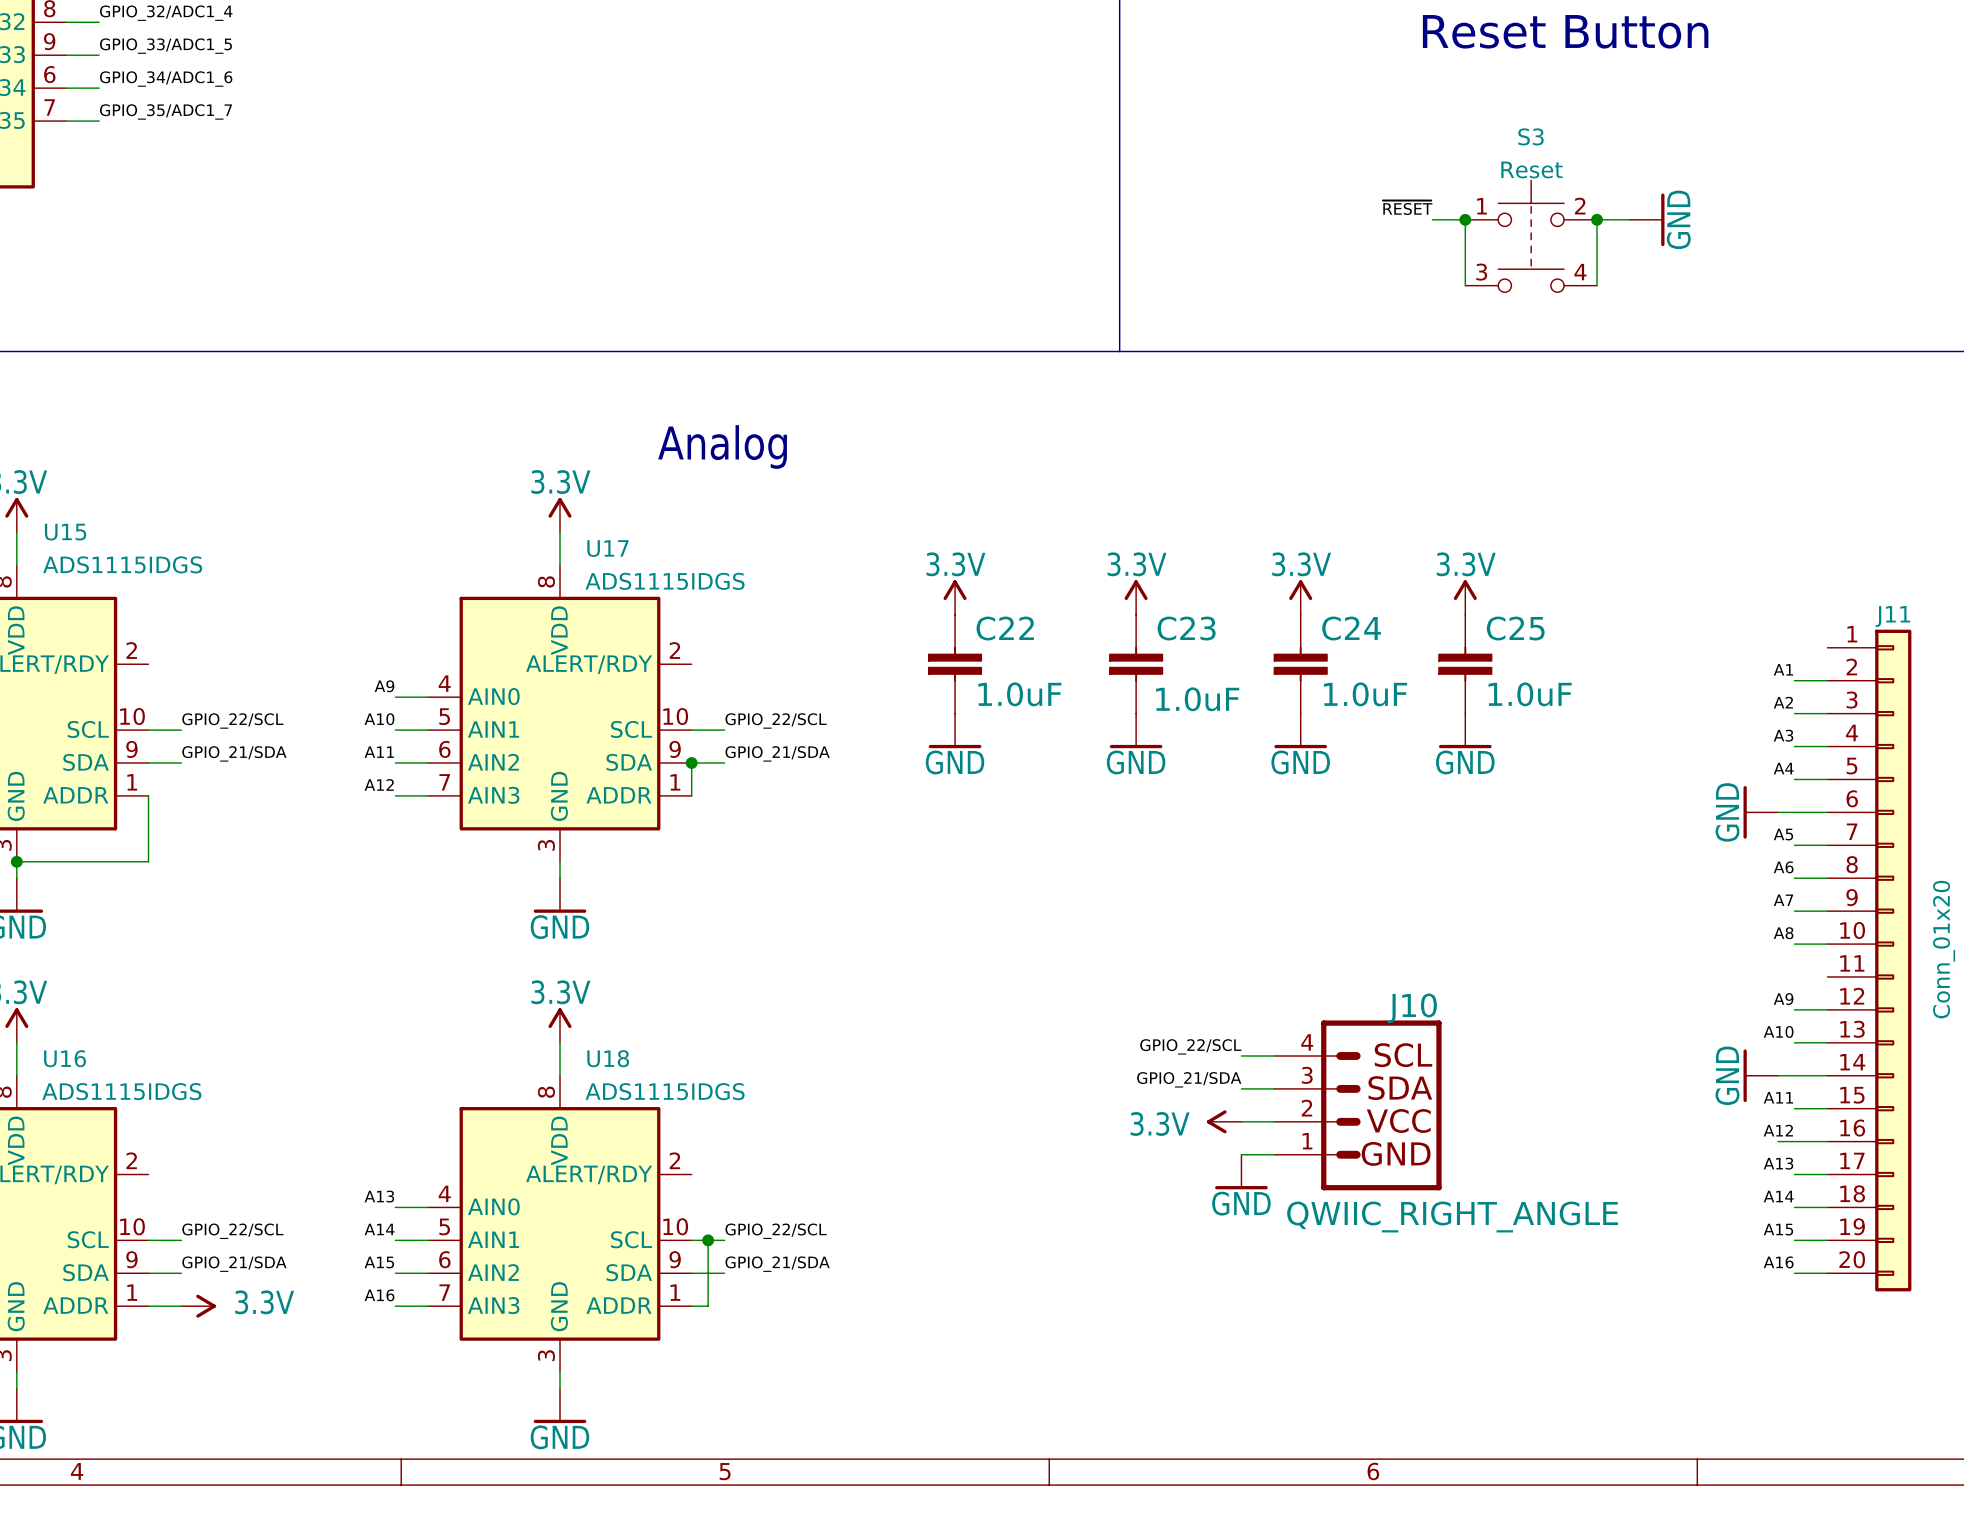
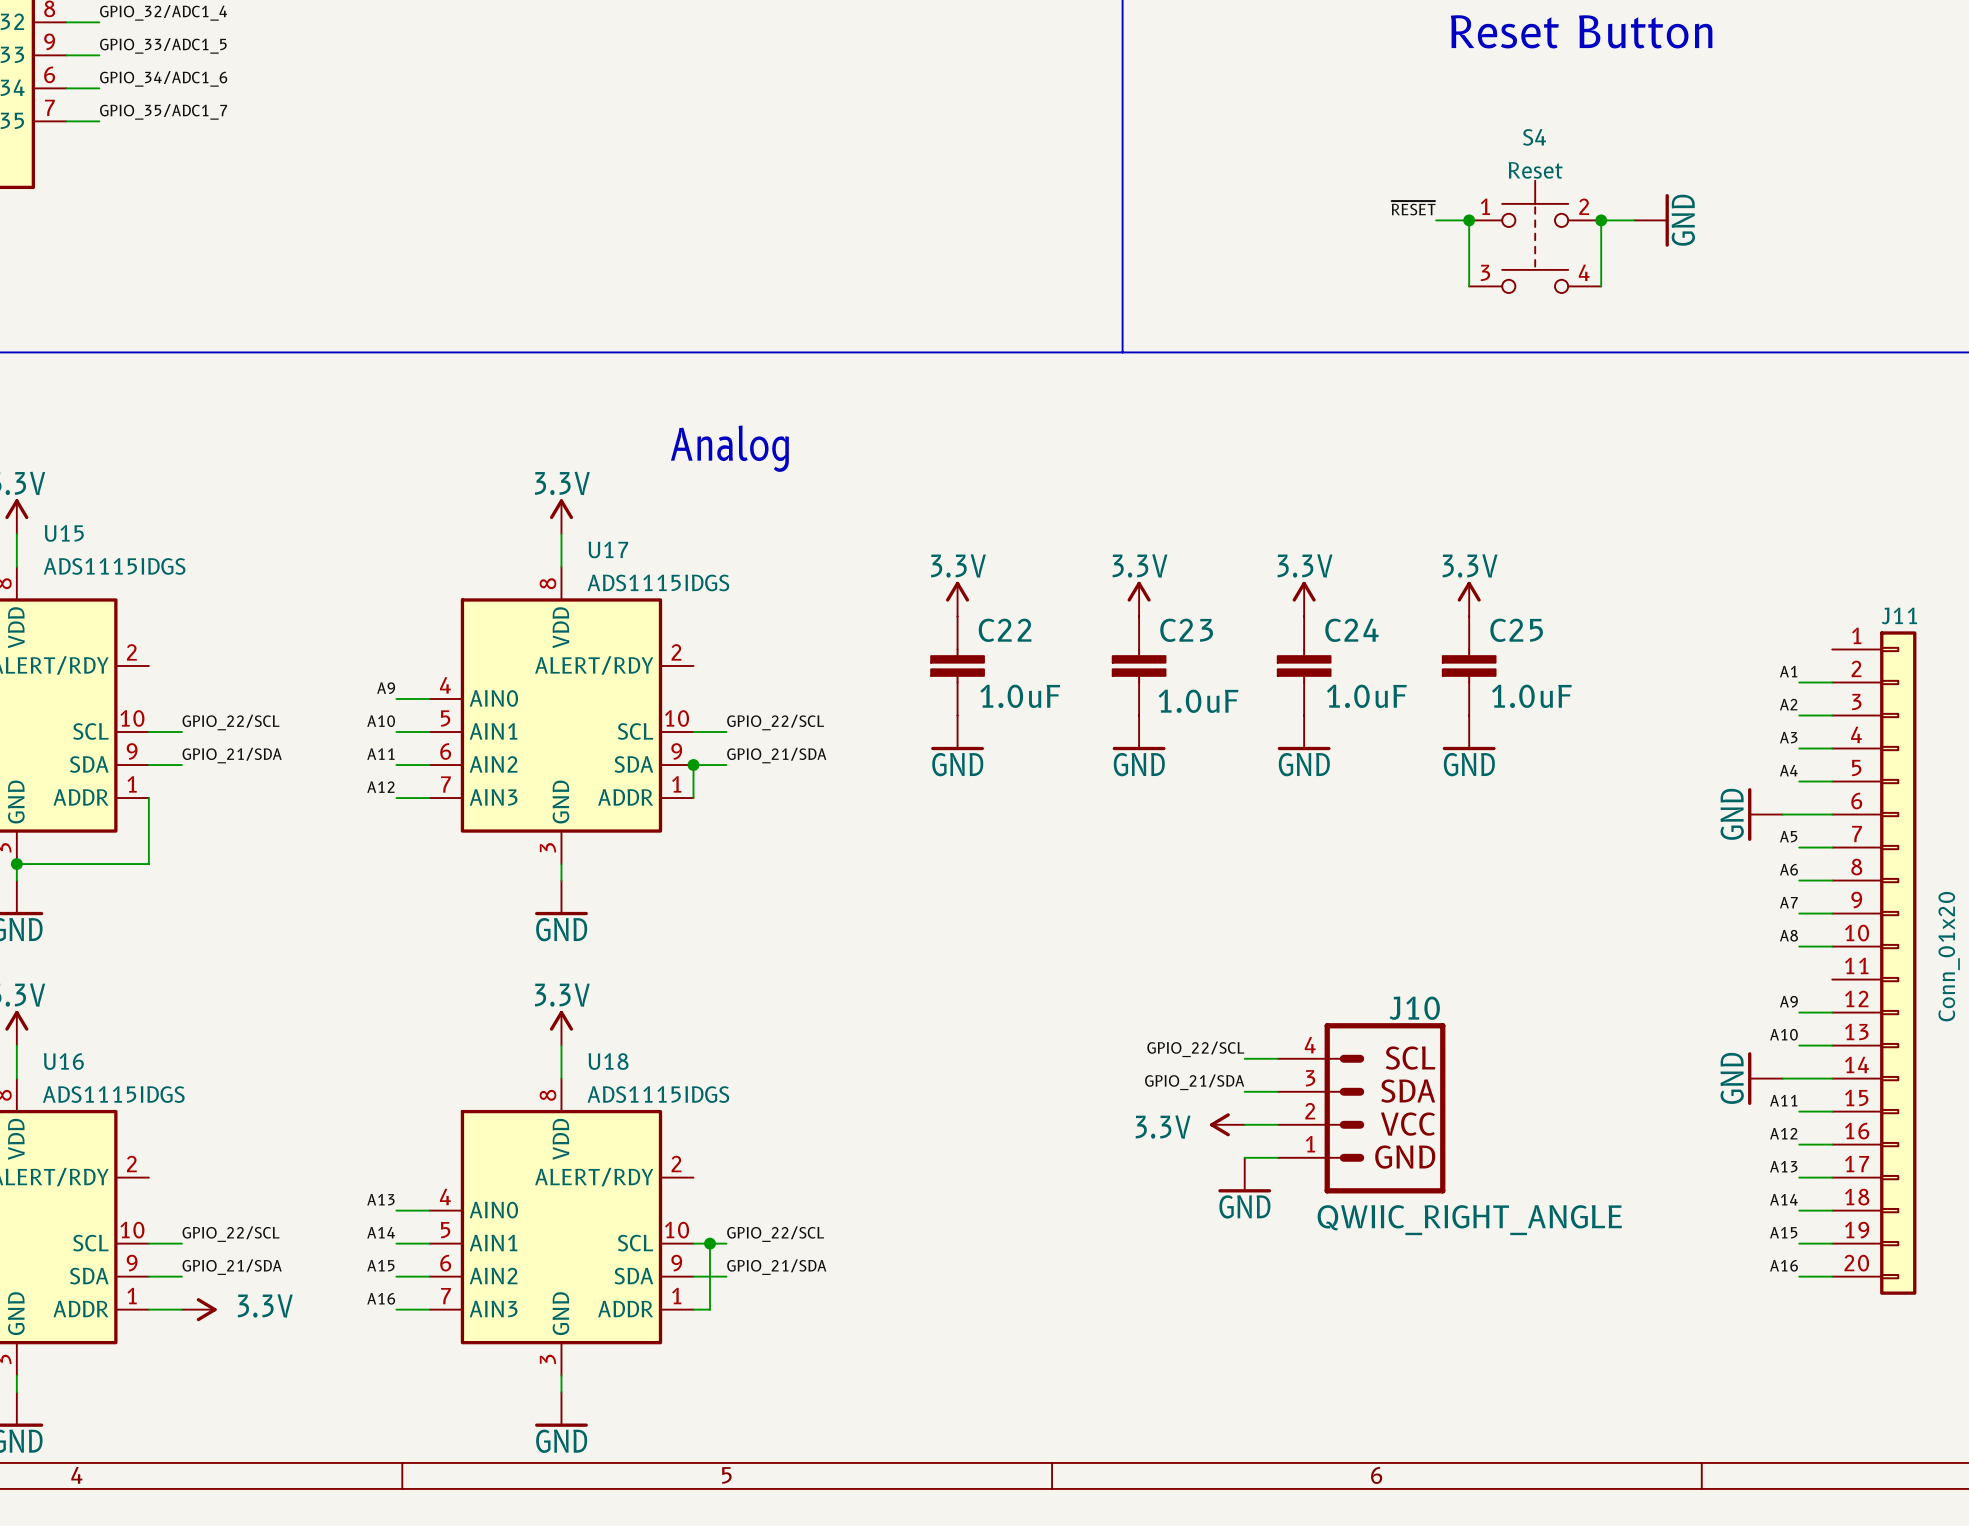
S3 name: S3 (1530, 136) -> S4 (1534, 137)
wire: (1778, 1141) (1794, 1141) -> none

